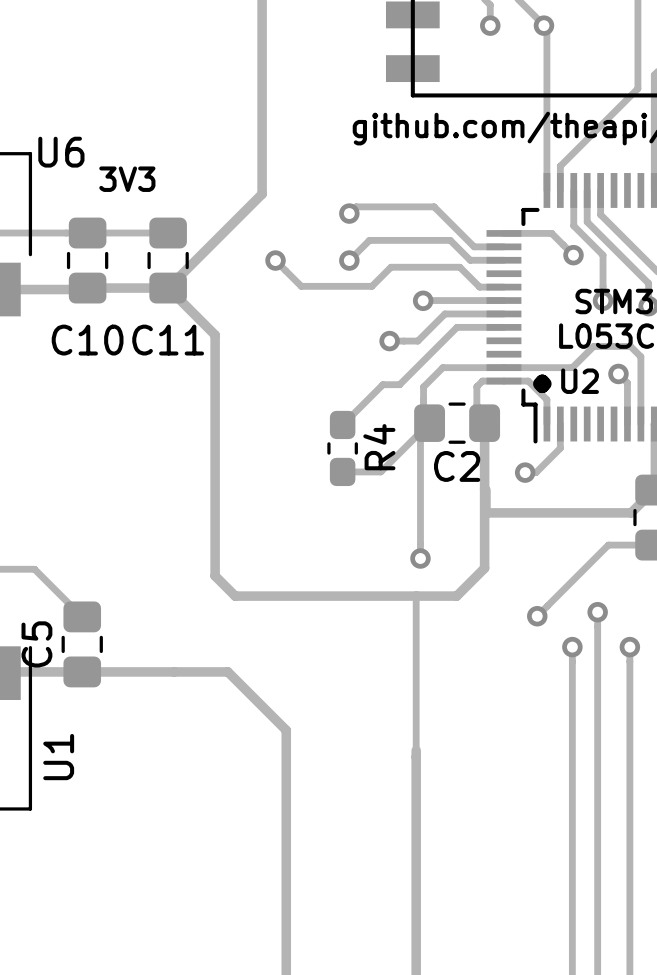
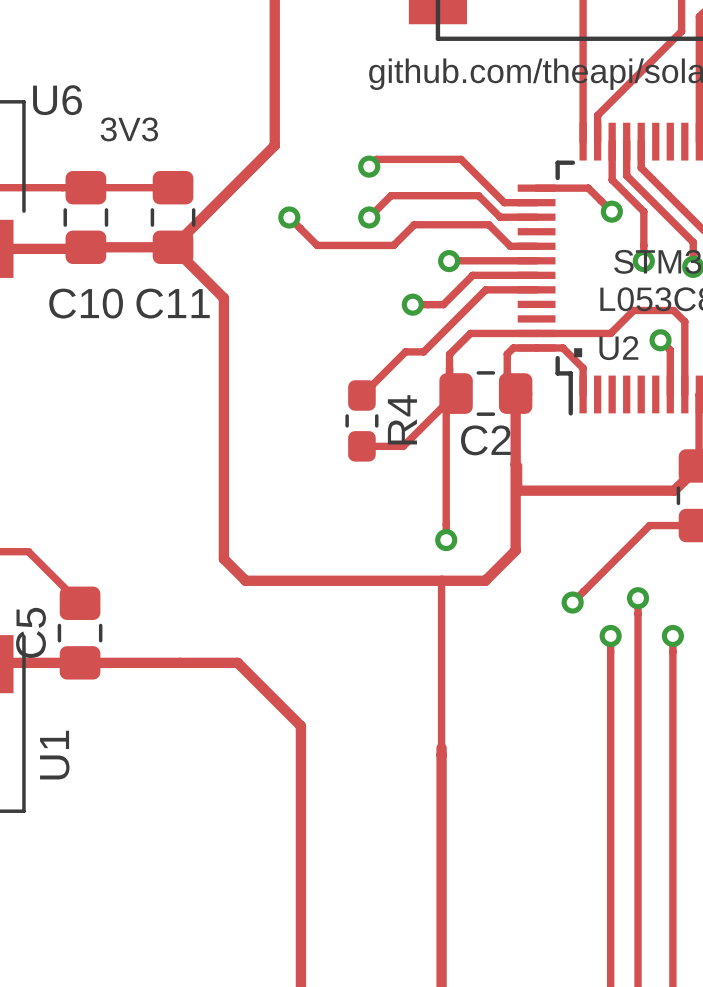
track: (560, 424) (560, 448) (536, 472) (525, 472) -> none
via: (525, 472) -> none

